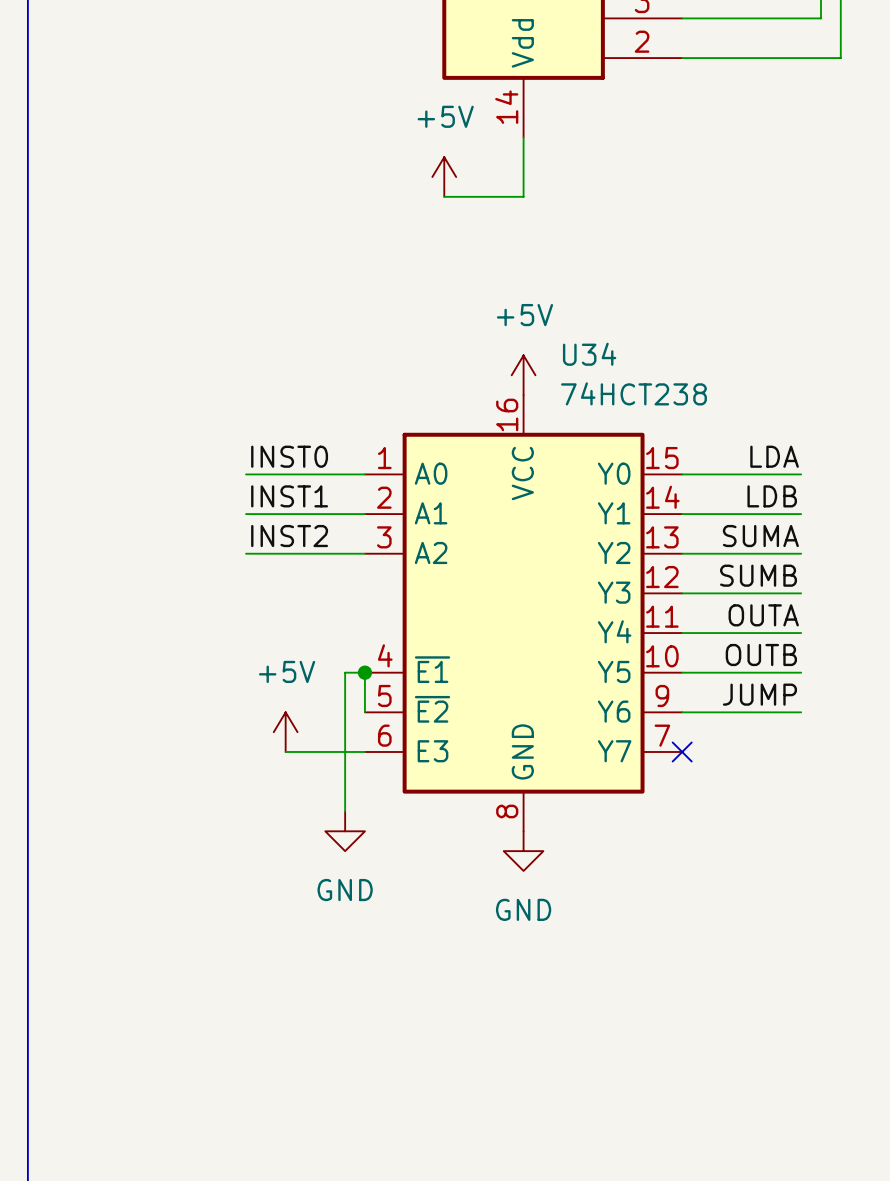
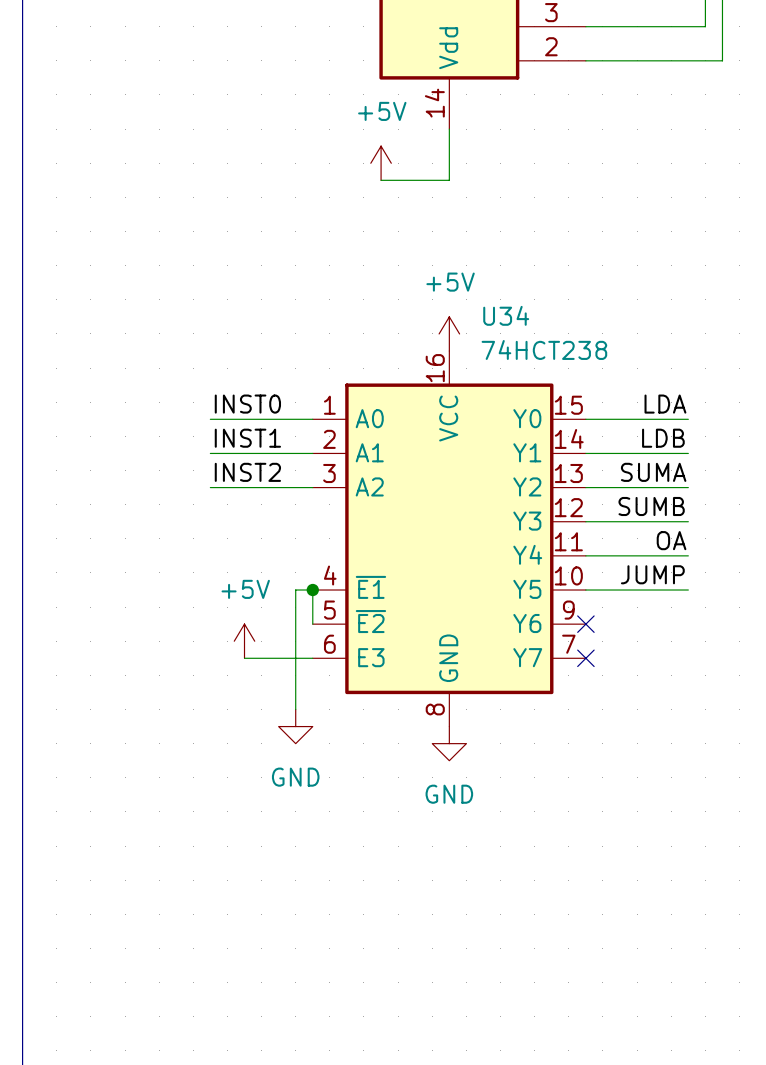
label: OUTA (763, 615) -> OA (671, 540)
label: OUTB (761, 654) -> JUMP (652, 574)
label: JUMP (759, 694) -> none
wire: (682, 712) (801, 712) -> none
no-connect mark: none -> (585, 624)

